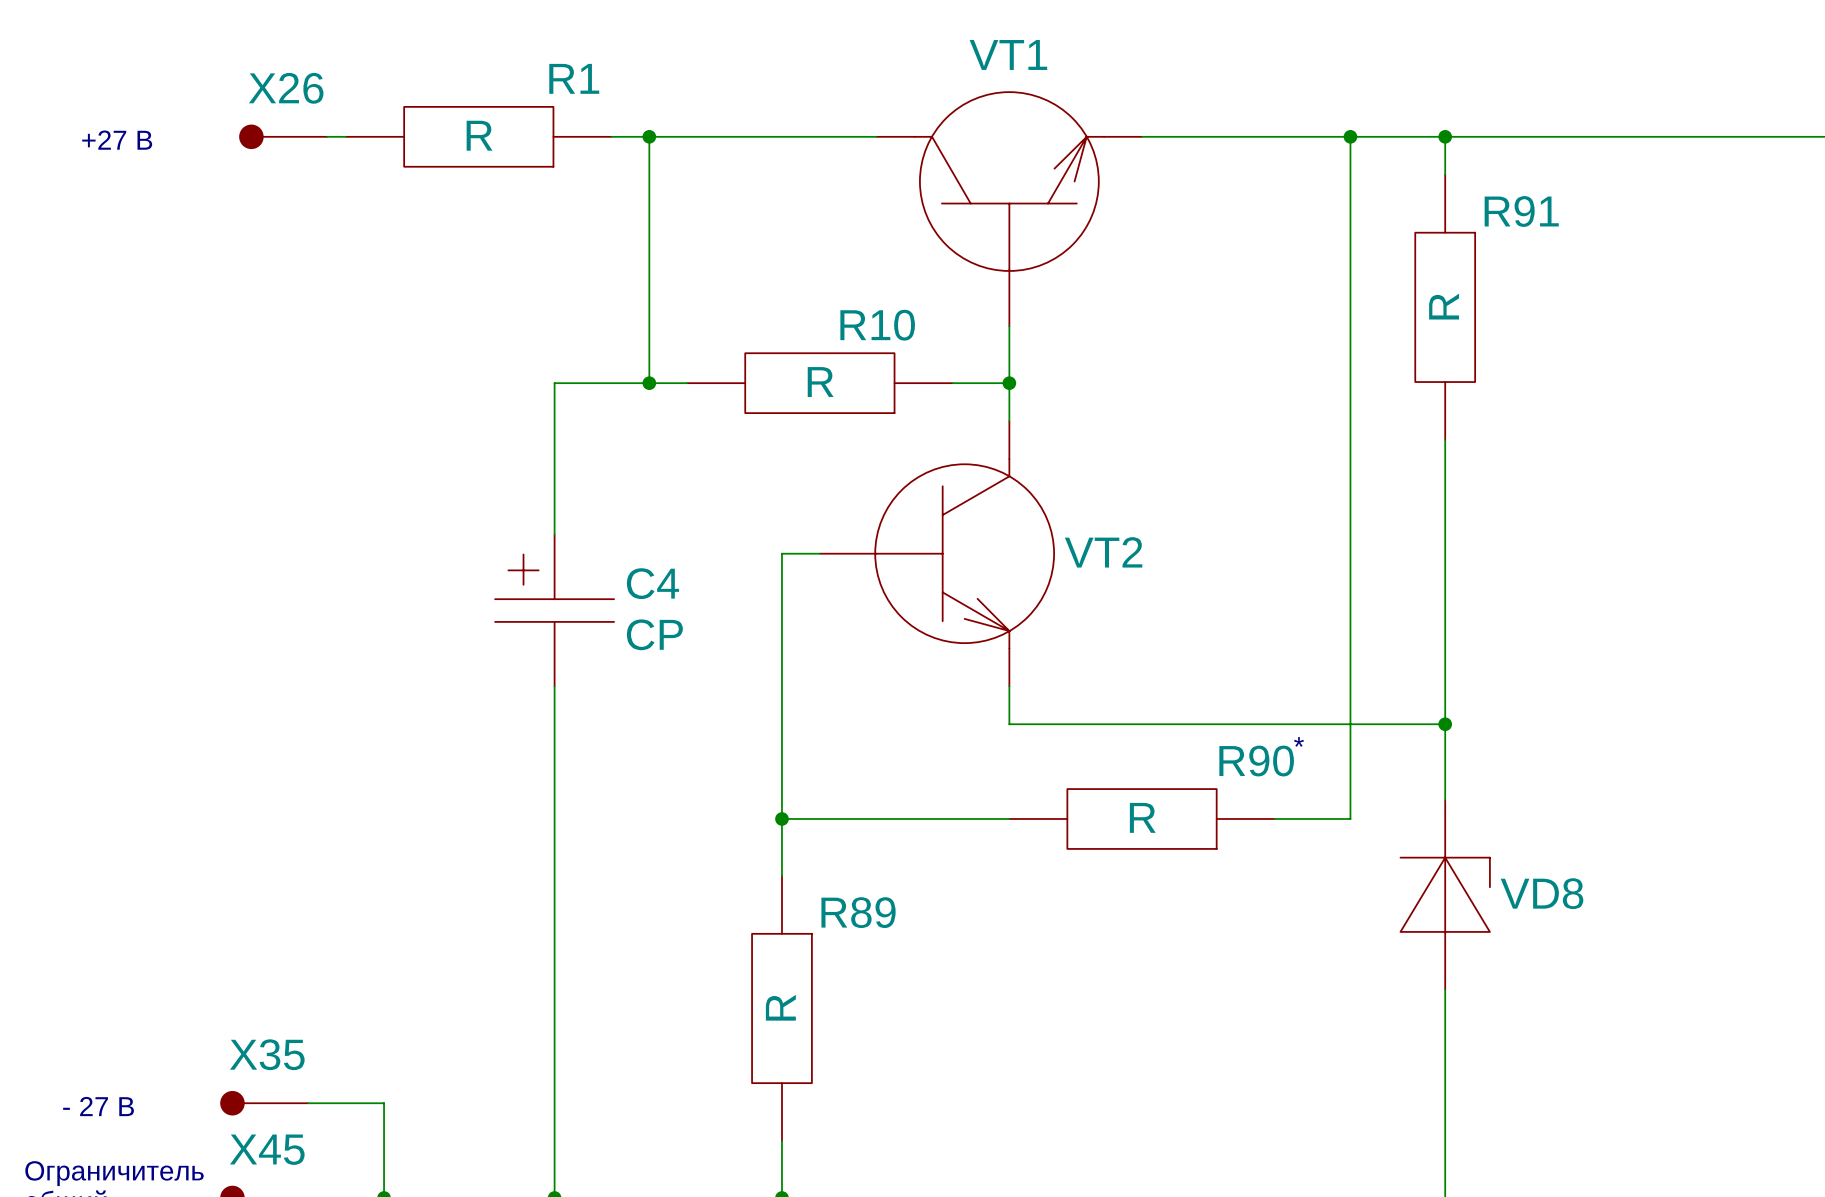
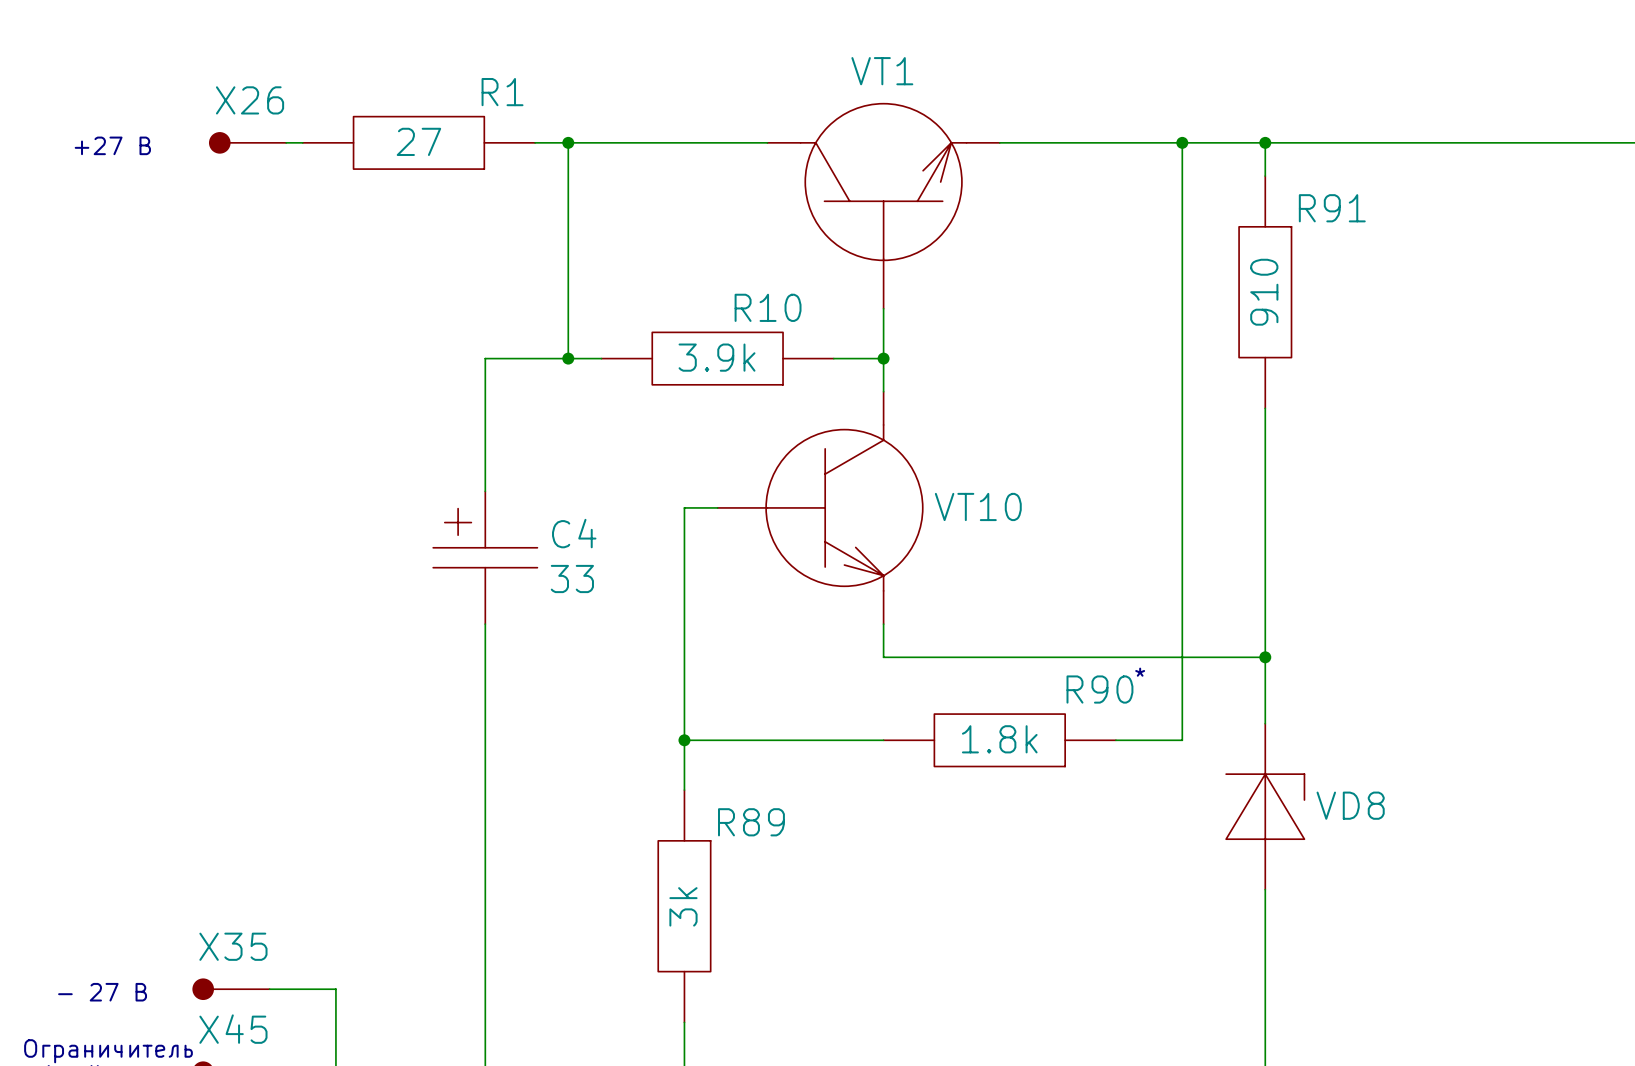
R1 value: R (479, 135) -> 27 (418, 141)
R91 value: R (1444, 306) -> 910 (1264, 292)
R10 value: R (820, 382) -> 3.9k (717, 357)
VT2 name: VT2 (1103, 552) -> VT10 (978, 506)
C4 value: CP (654, 634) -> 33 (572, 579)
R90 value: R (1142, 817) -> 1.8k (999, 739)
R89 value: R (780, 1007) -> 3k (683, 906)

